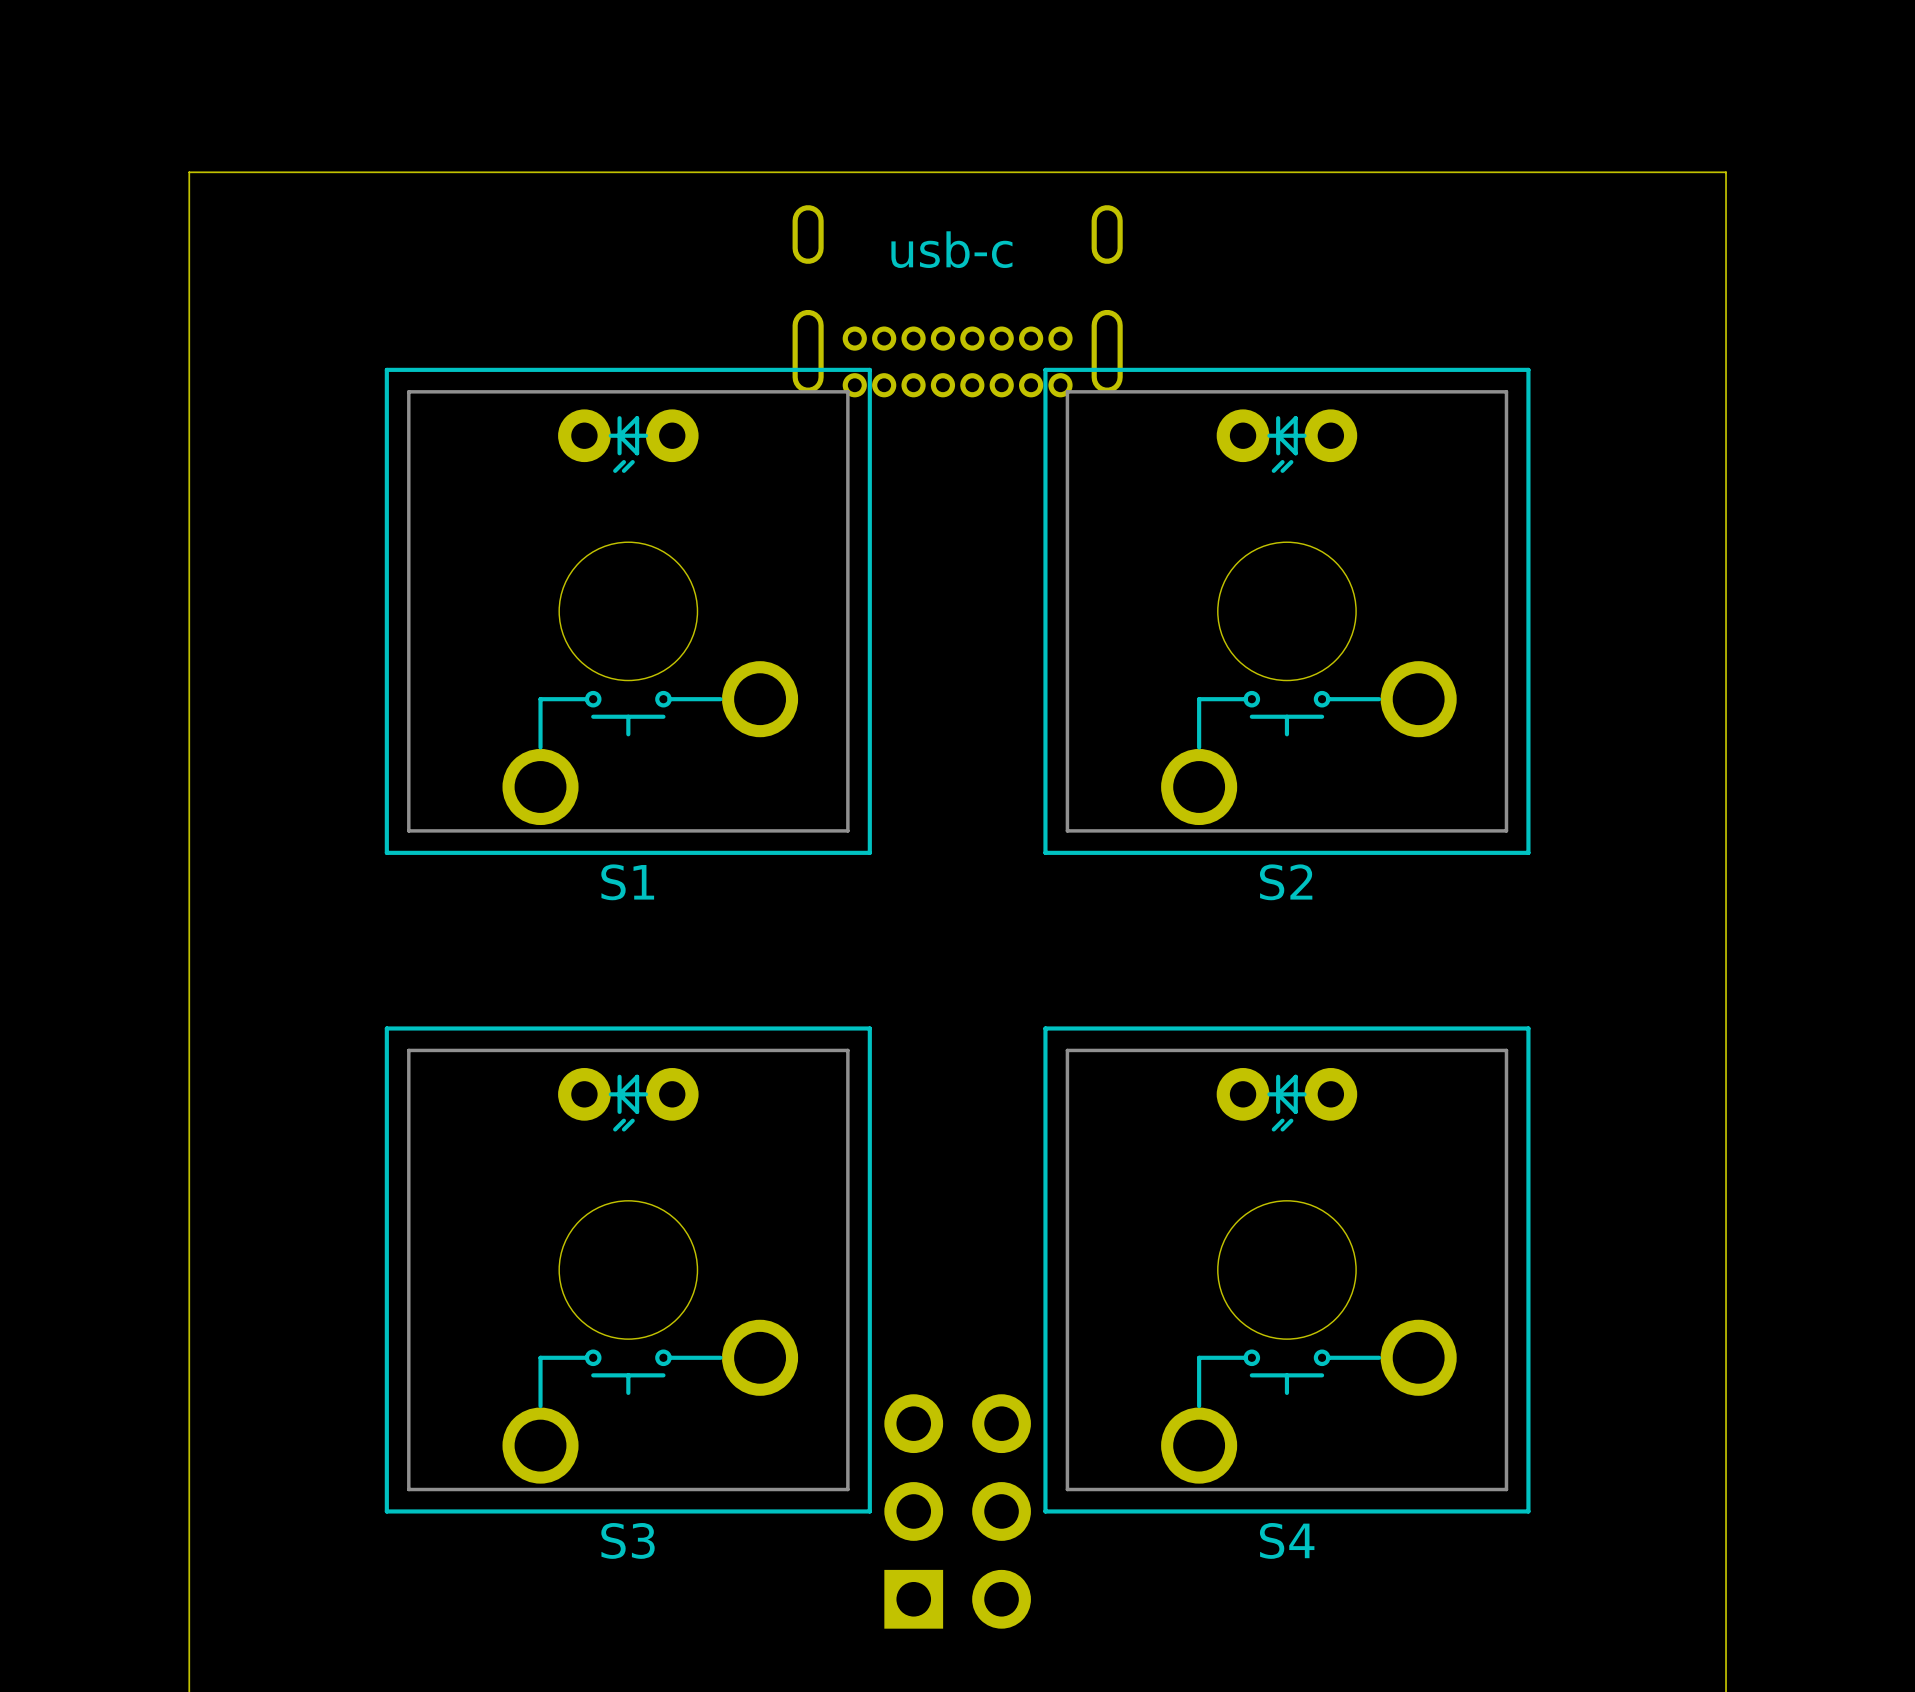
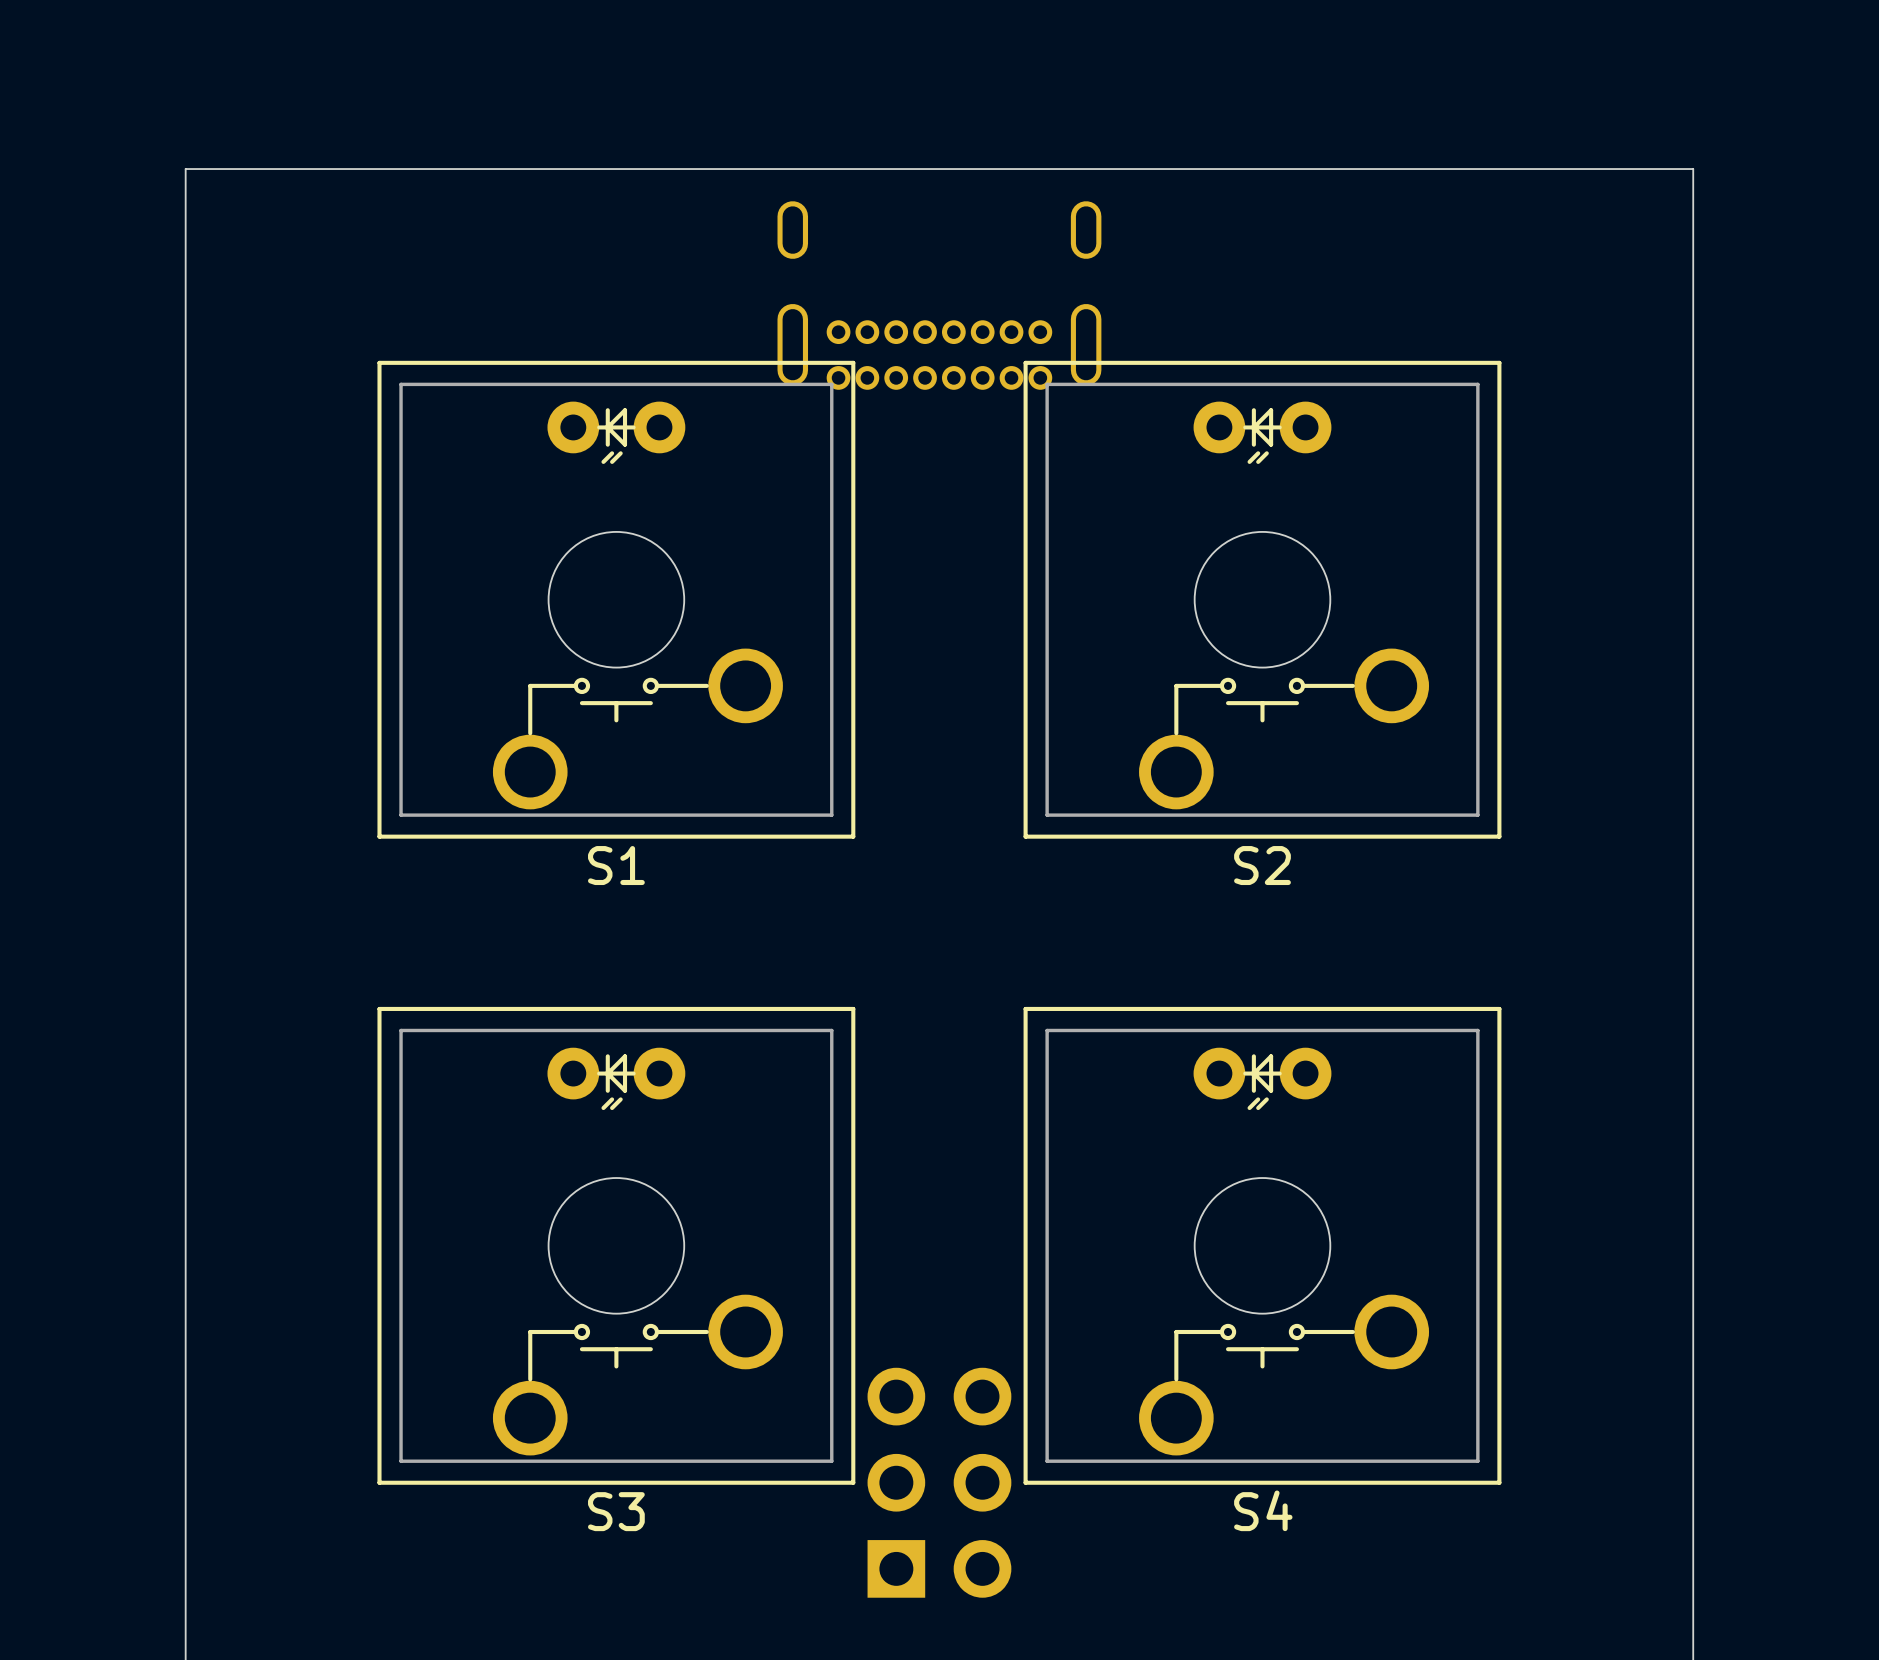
part value: usb-c (951, 249) -> none

